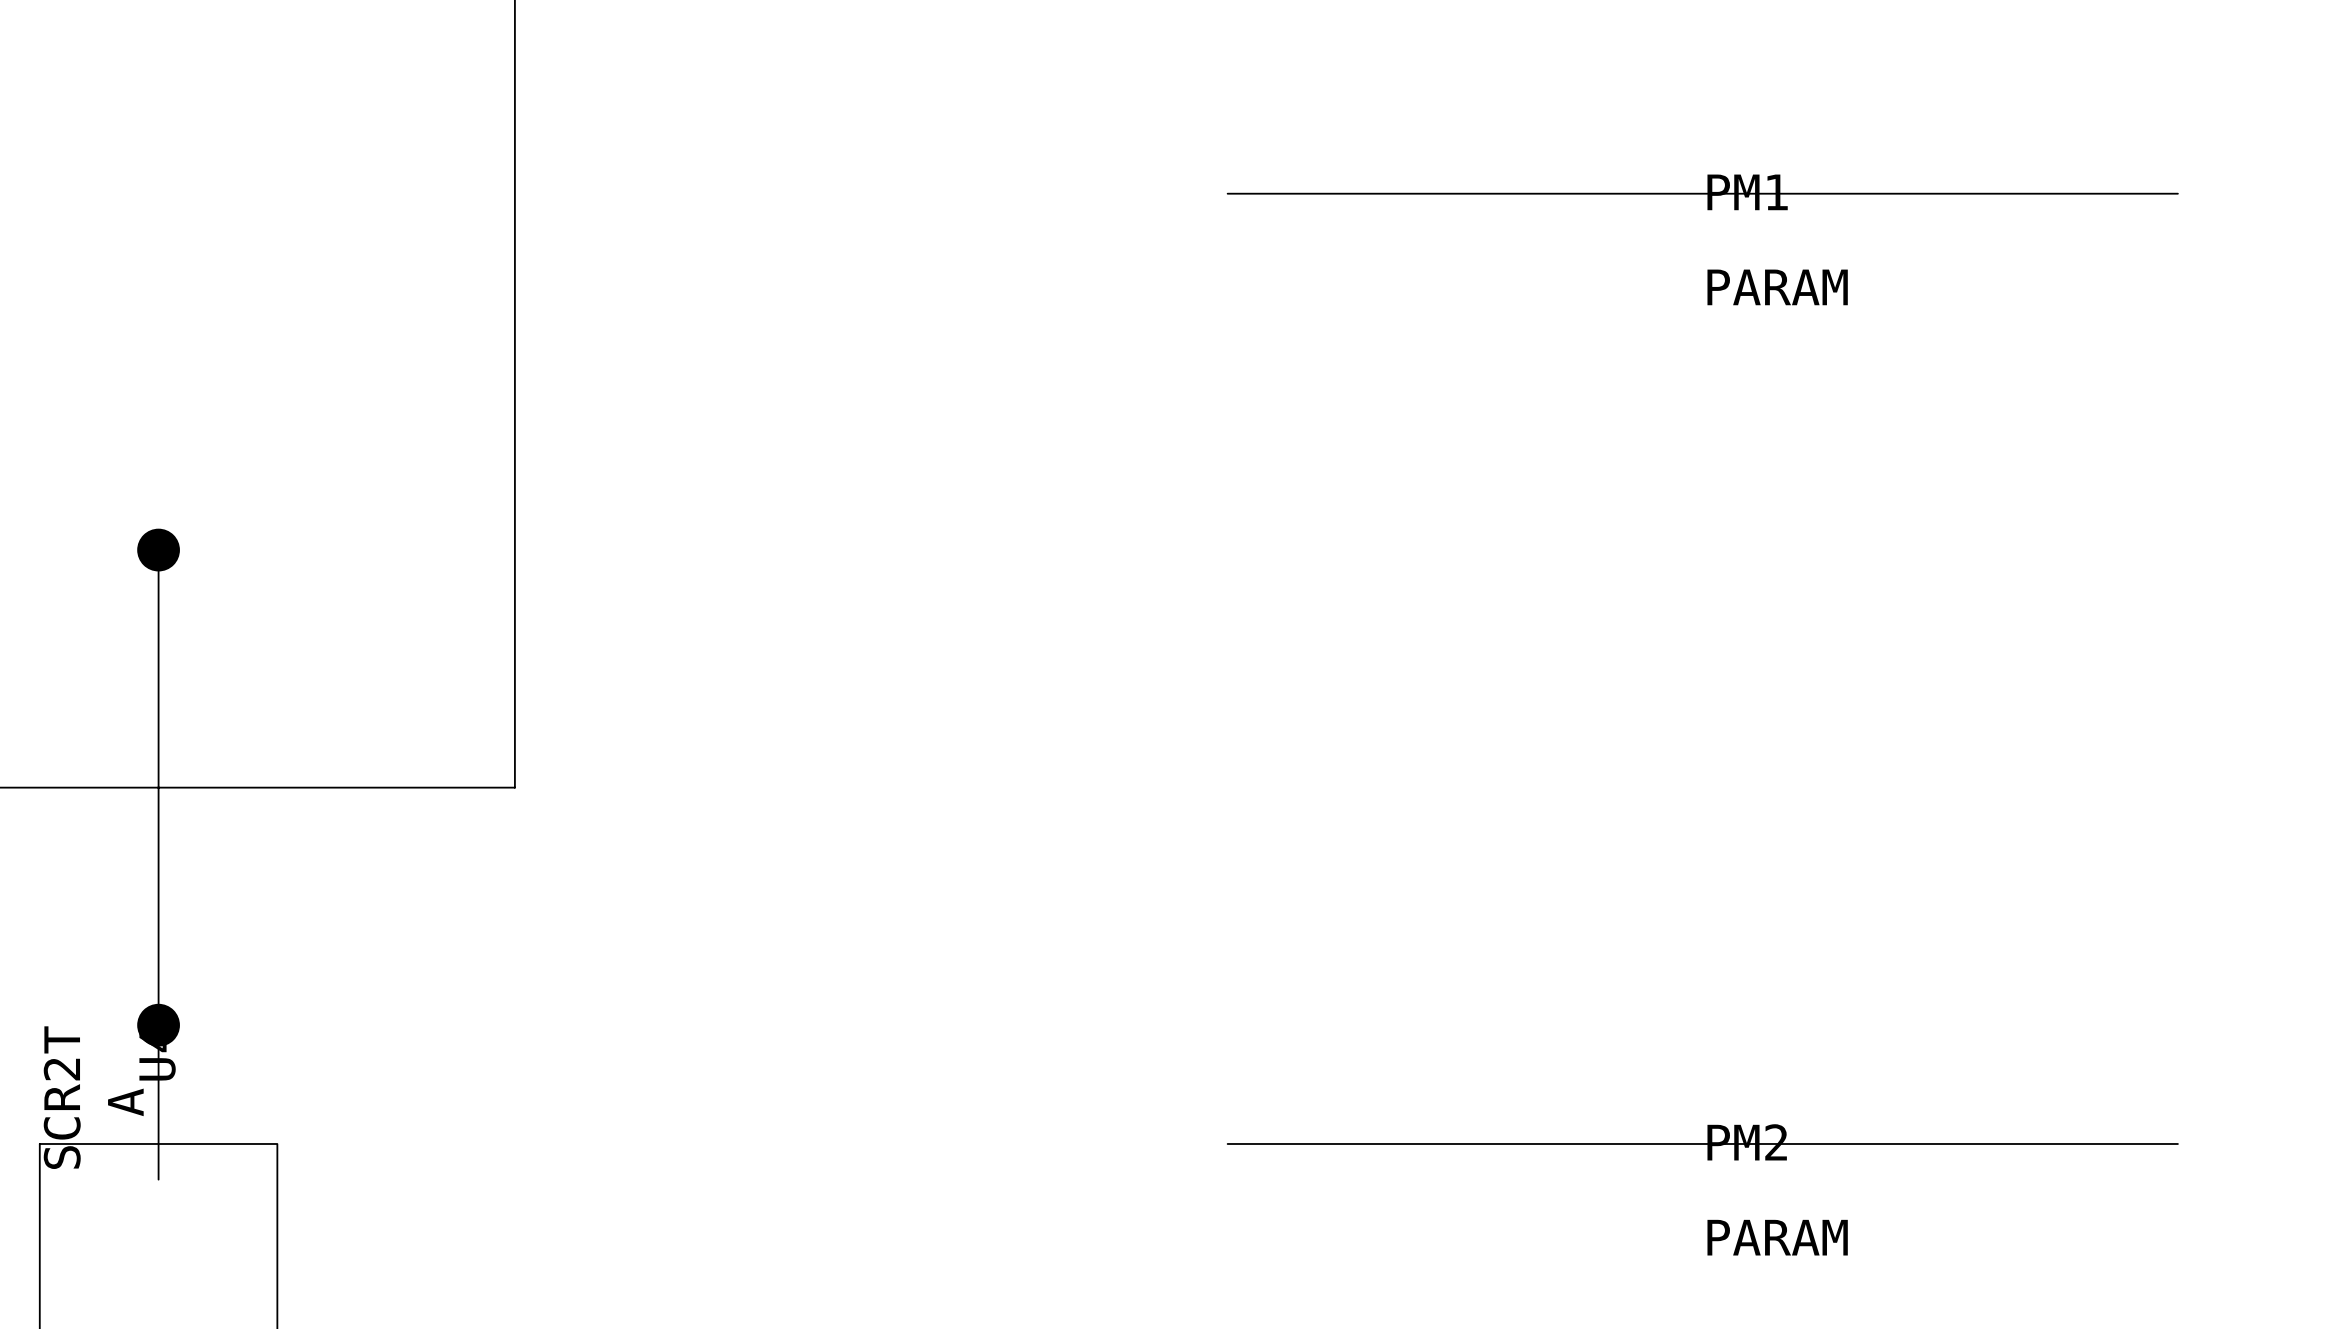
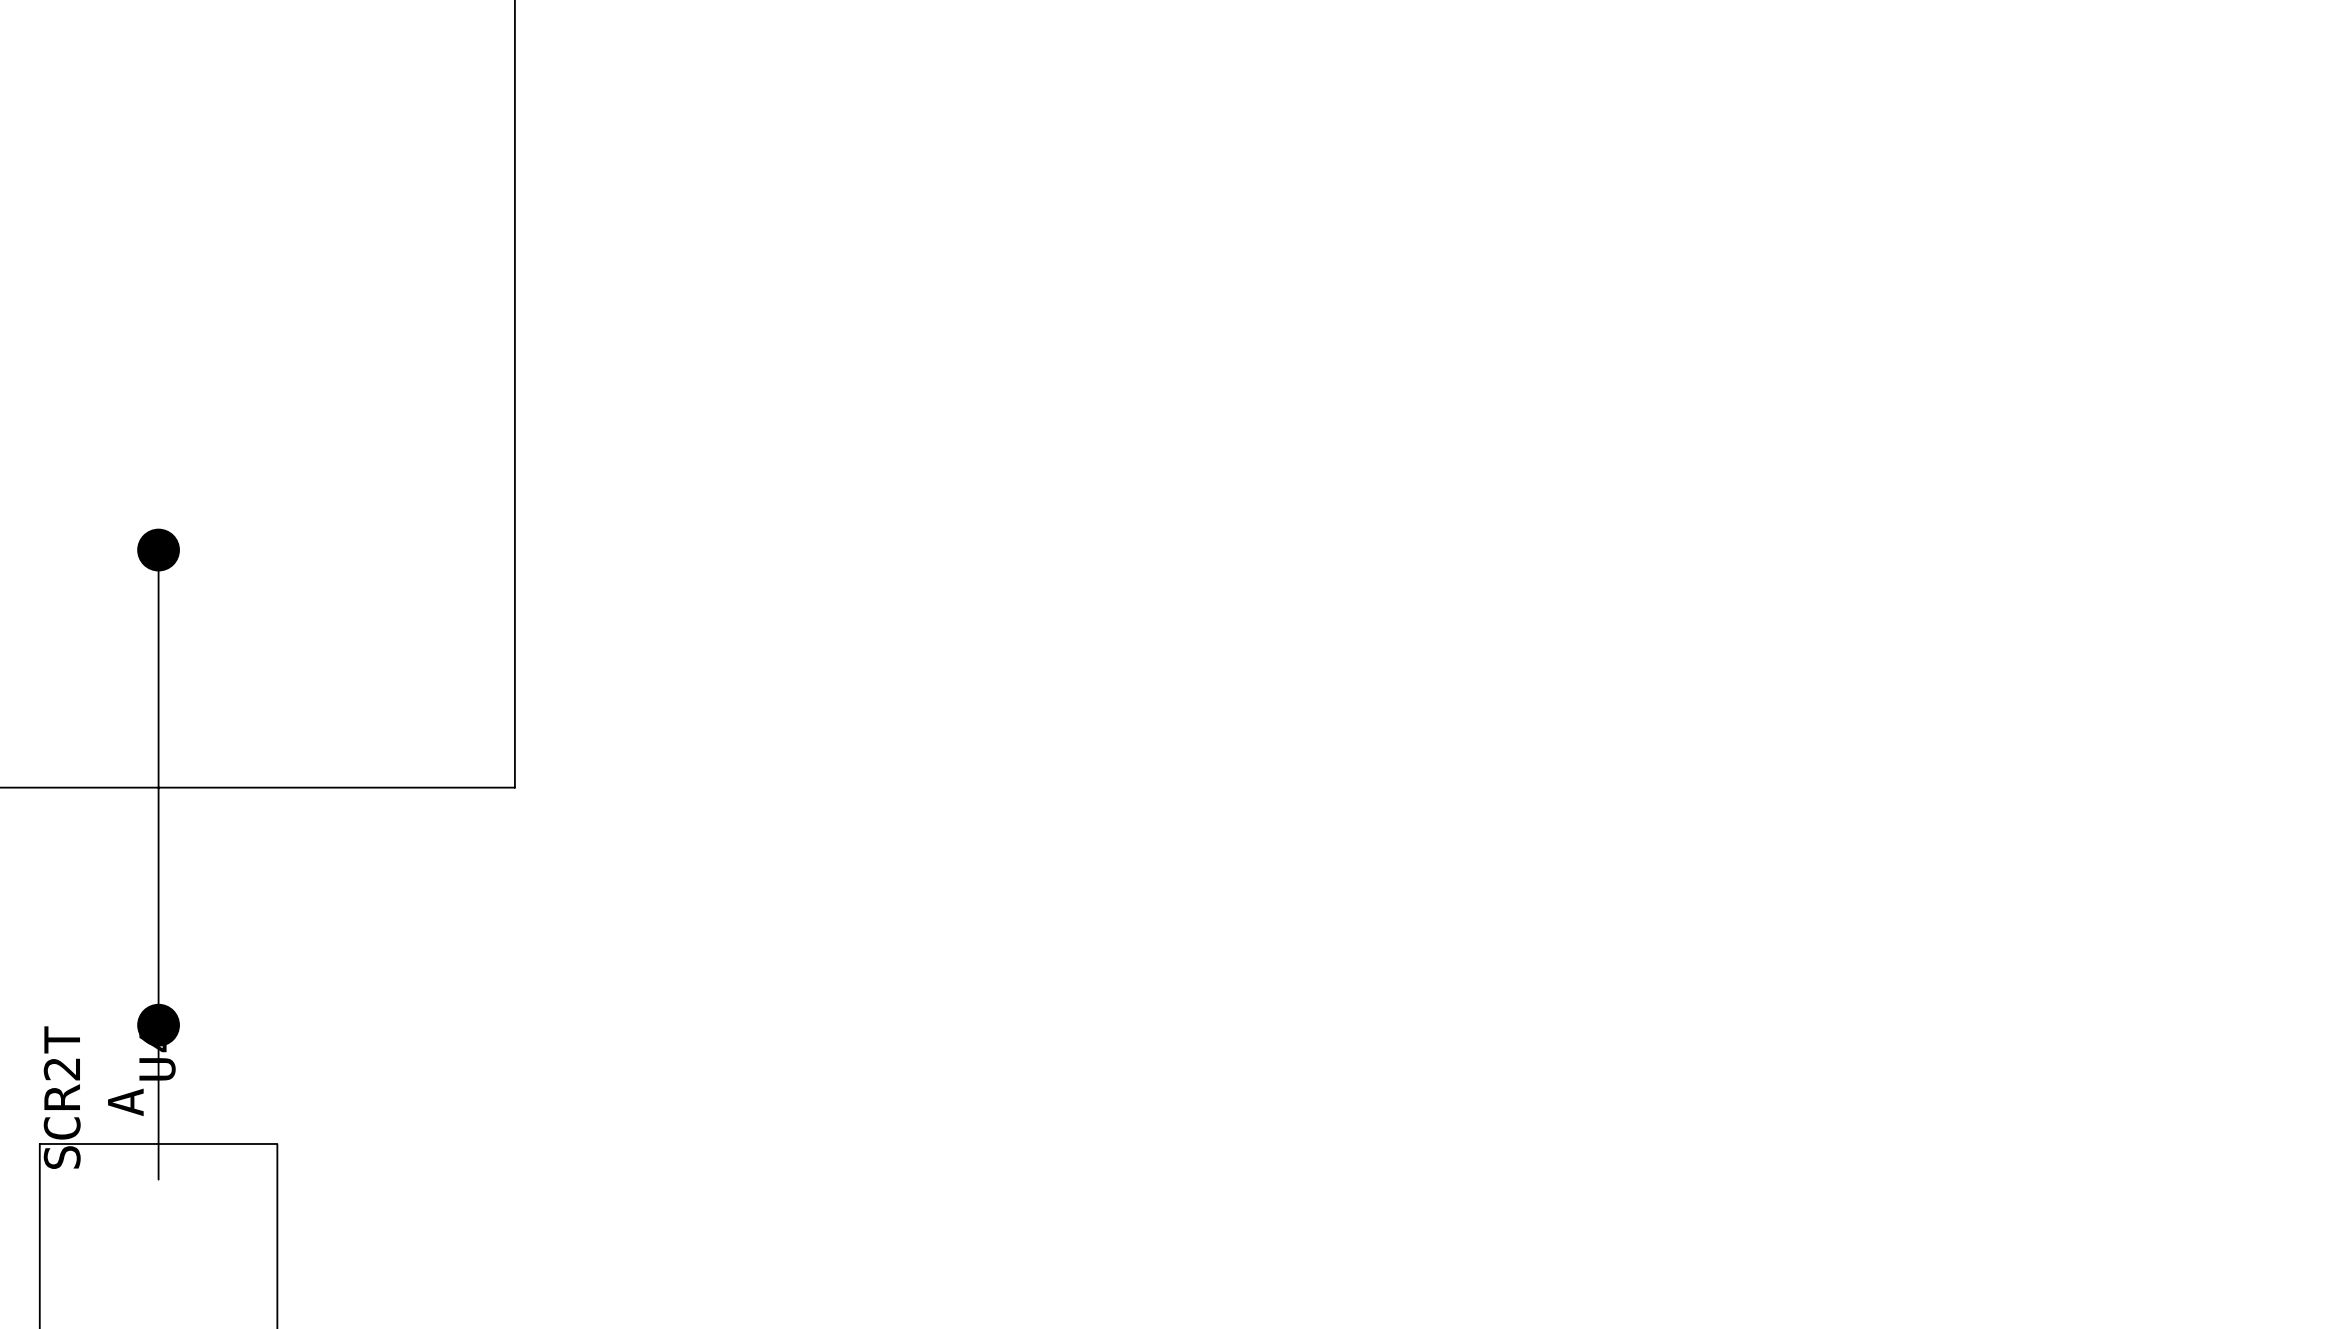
PM1: PARAM (1702, 193) -> none
PM2: PARAM (1702, 1143) -> none

